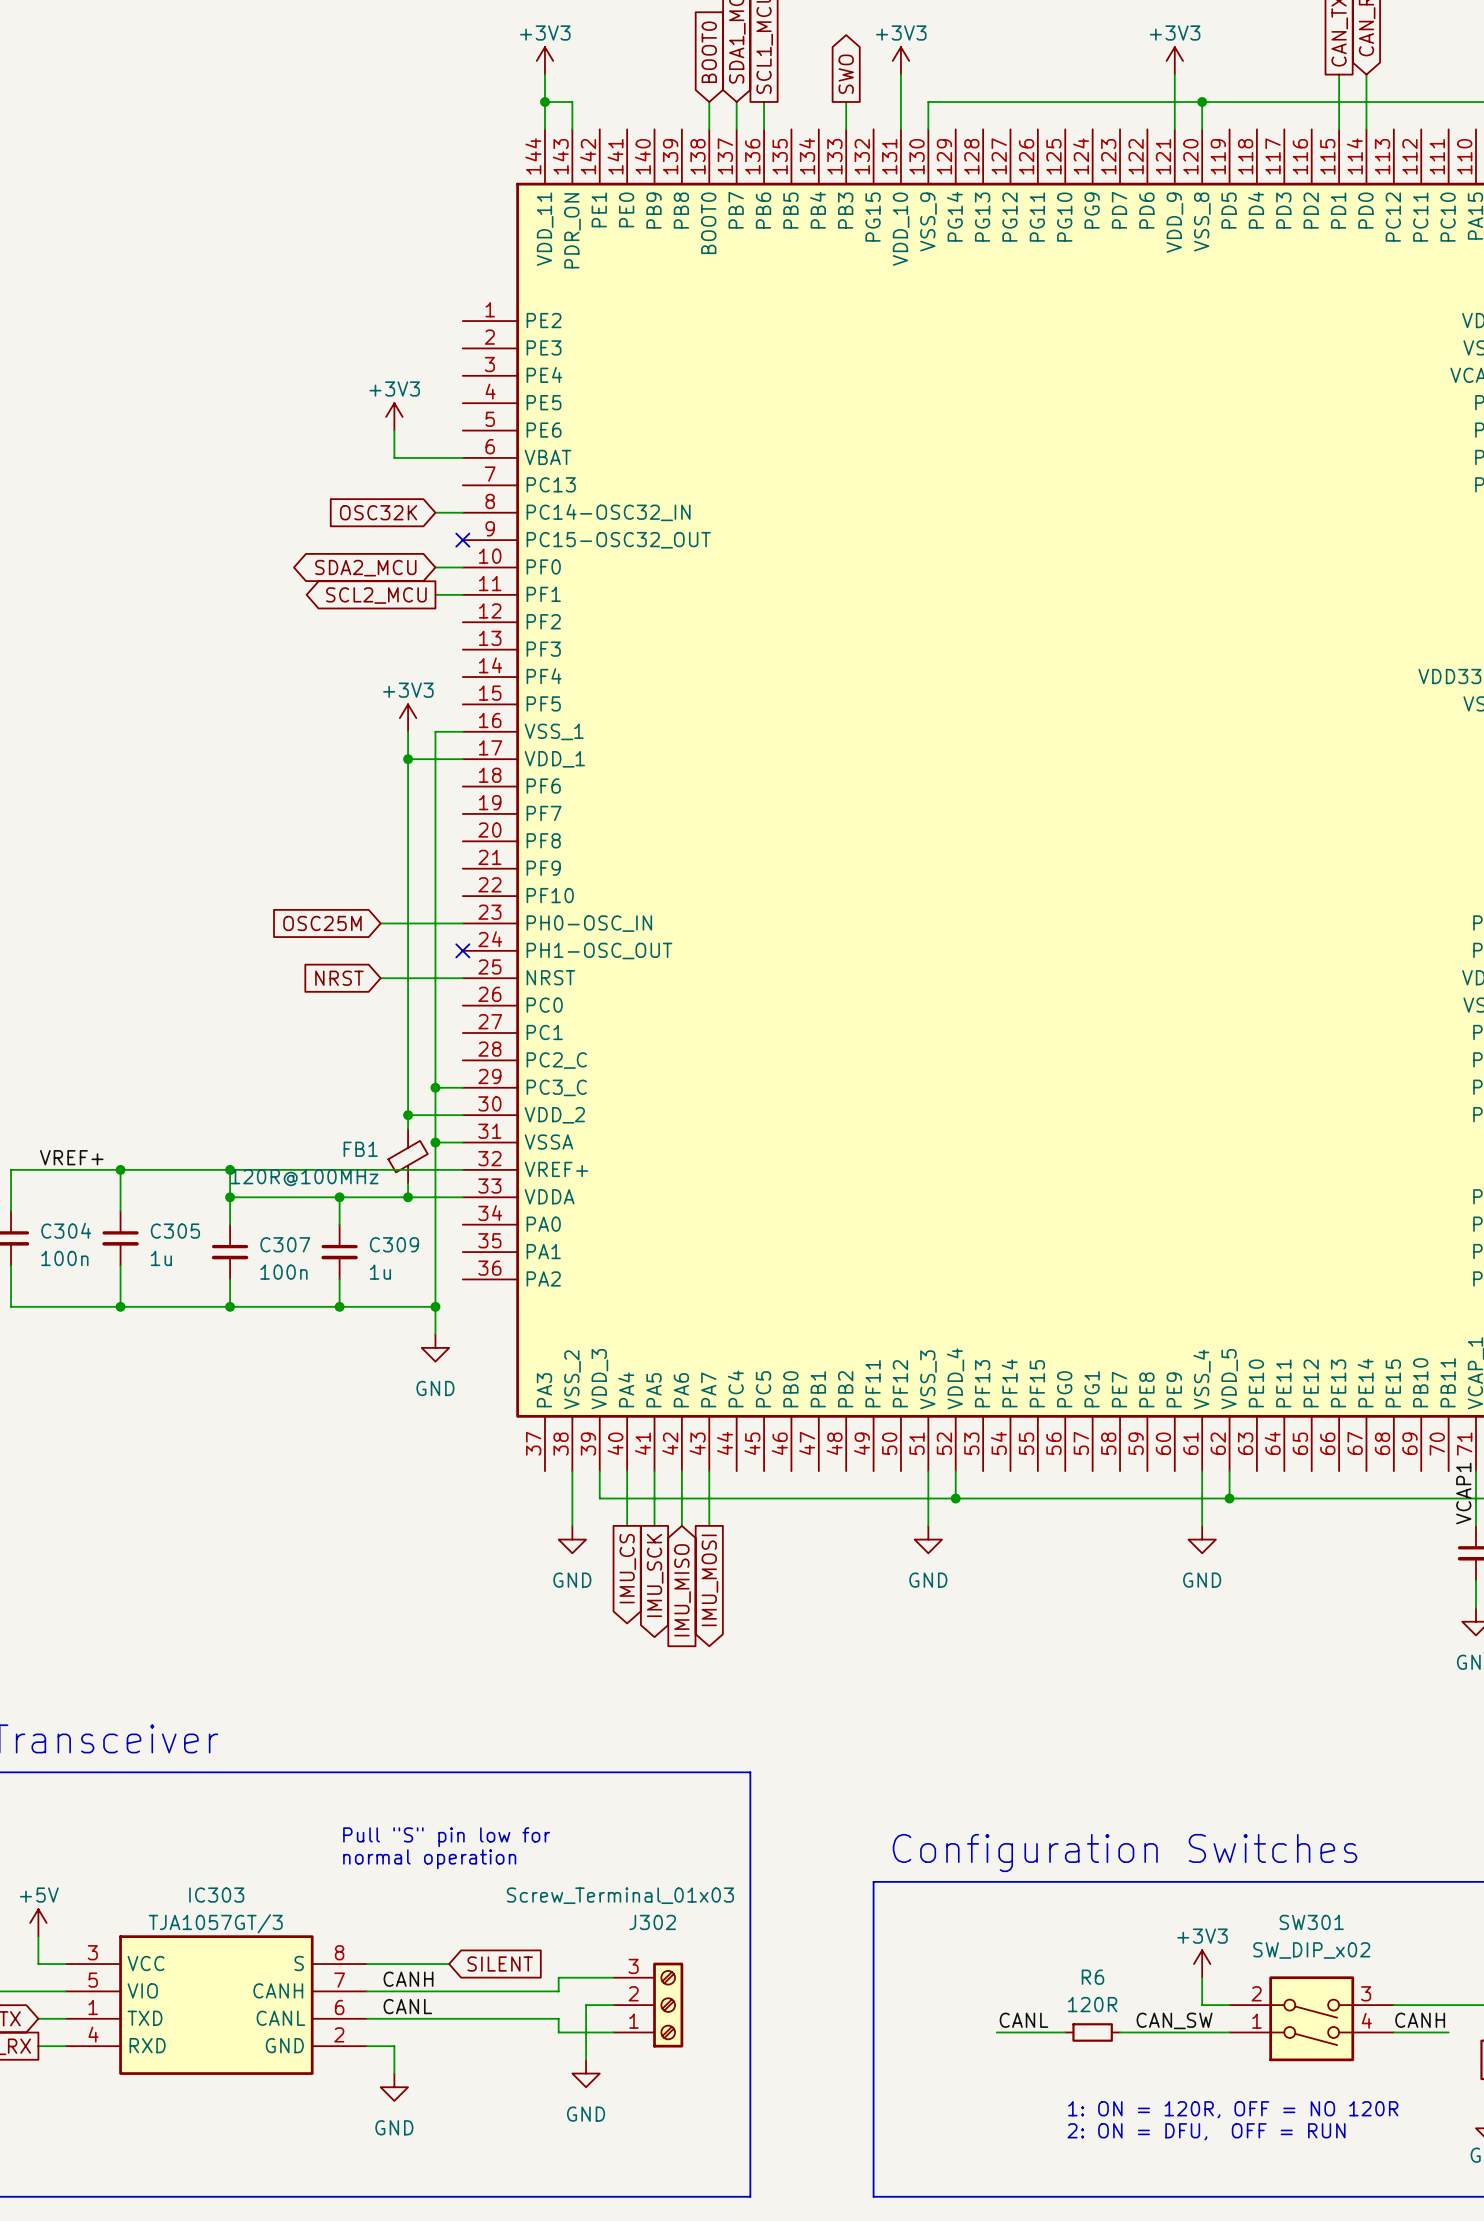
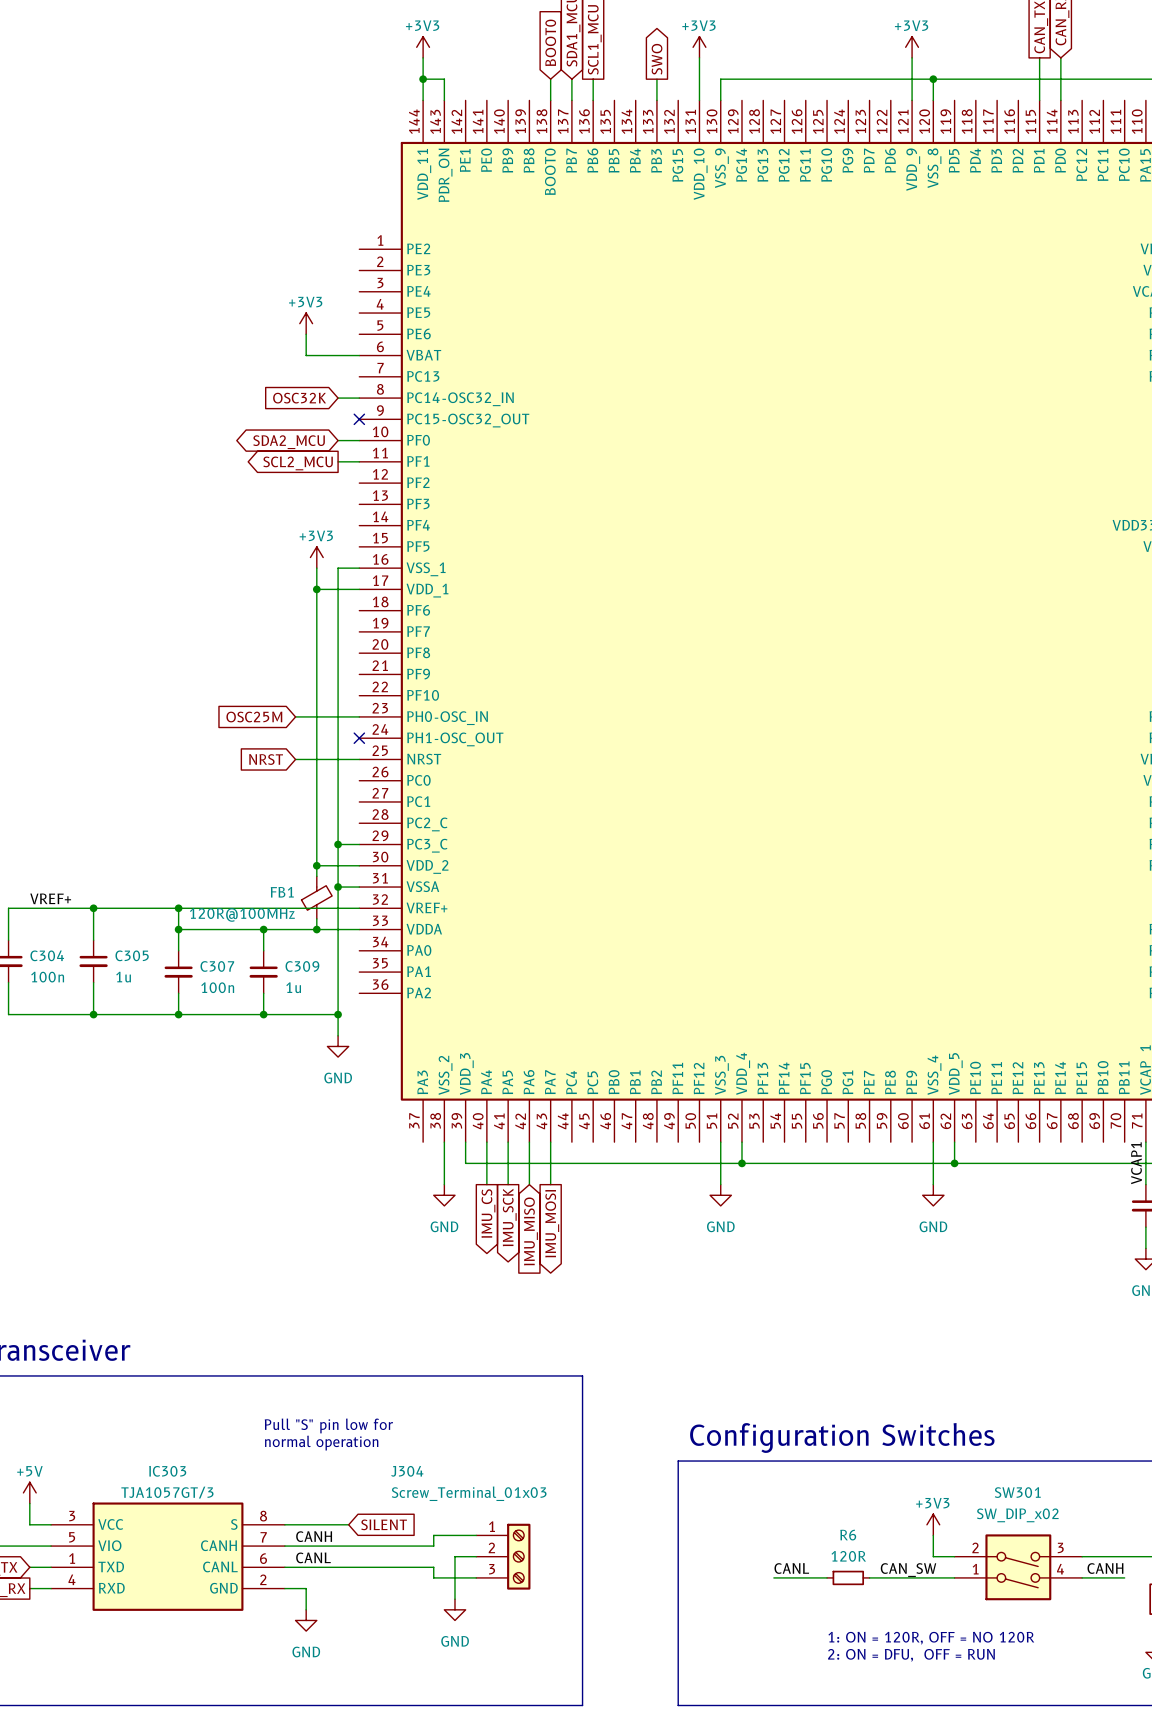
J302: Screw_Terminal_01x03 (648, 2005) -> none
J304: none -> Screw_Terminal_01x03 (503, 1556)

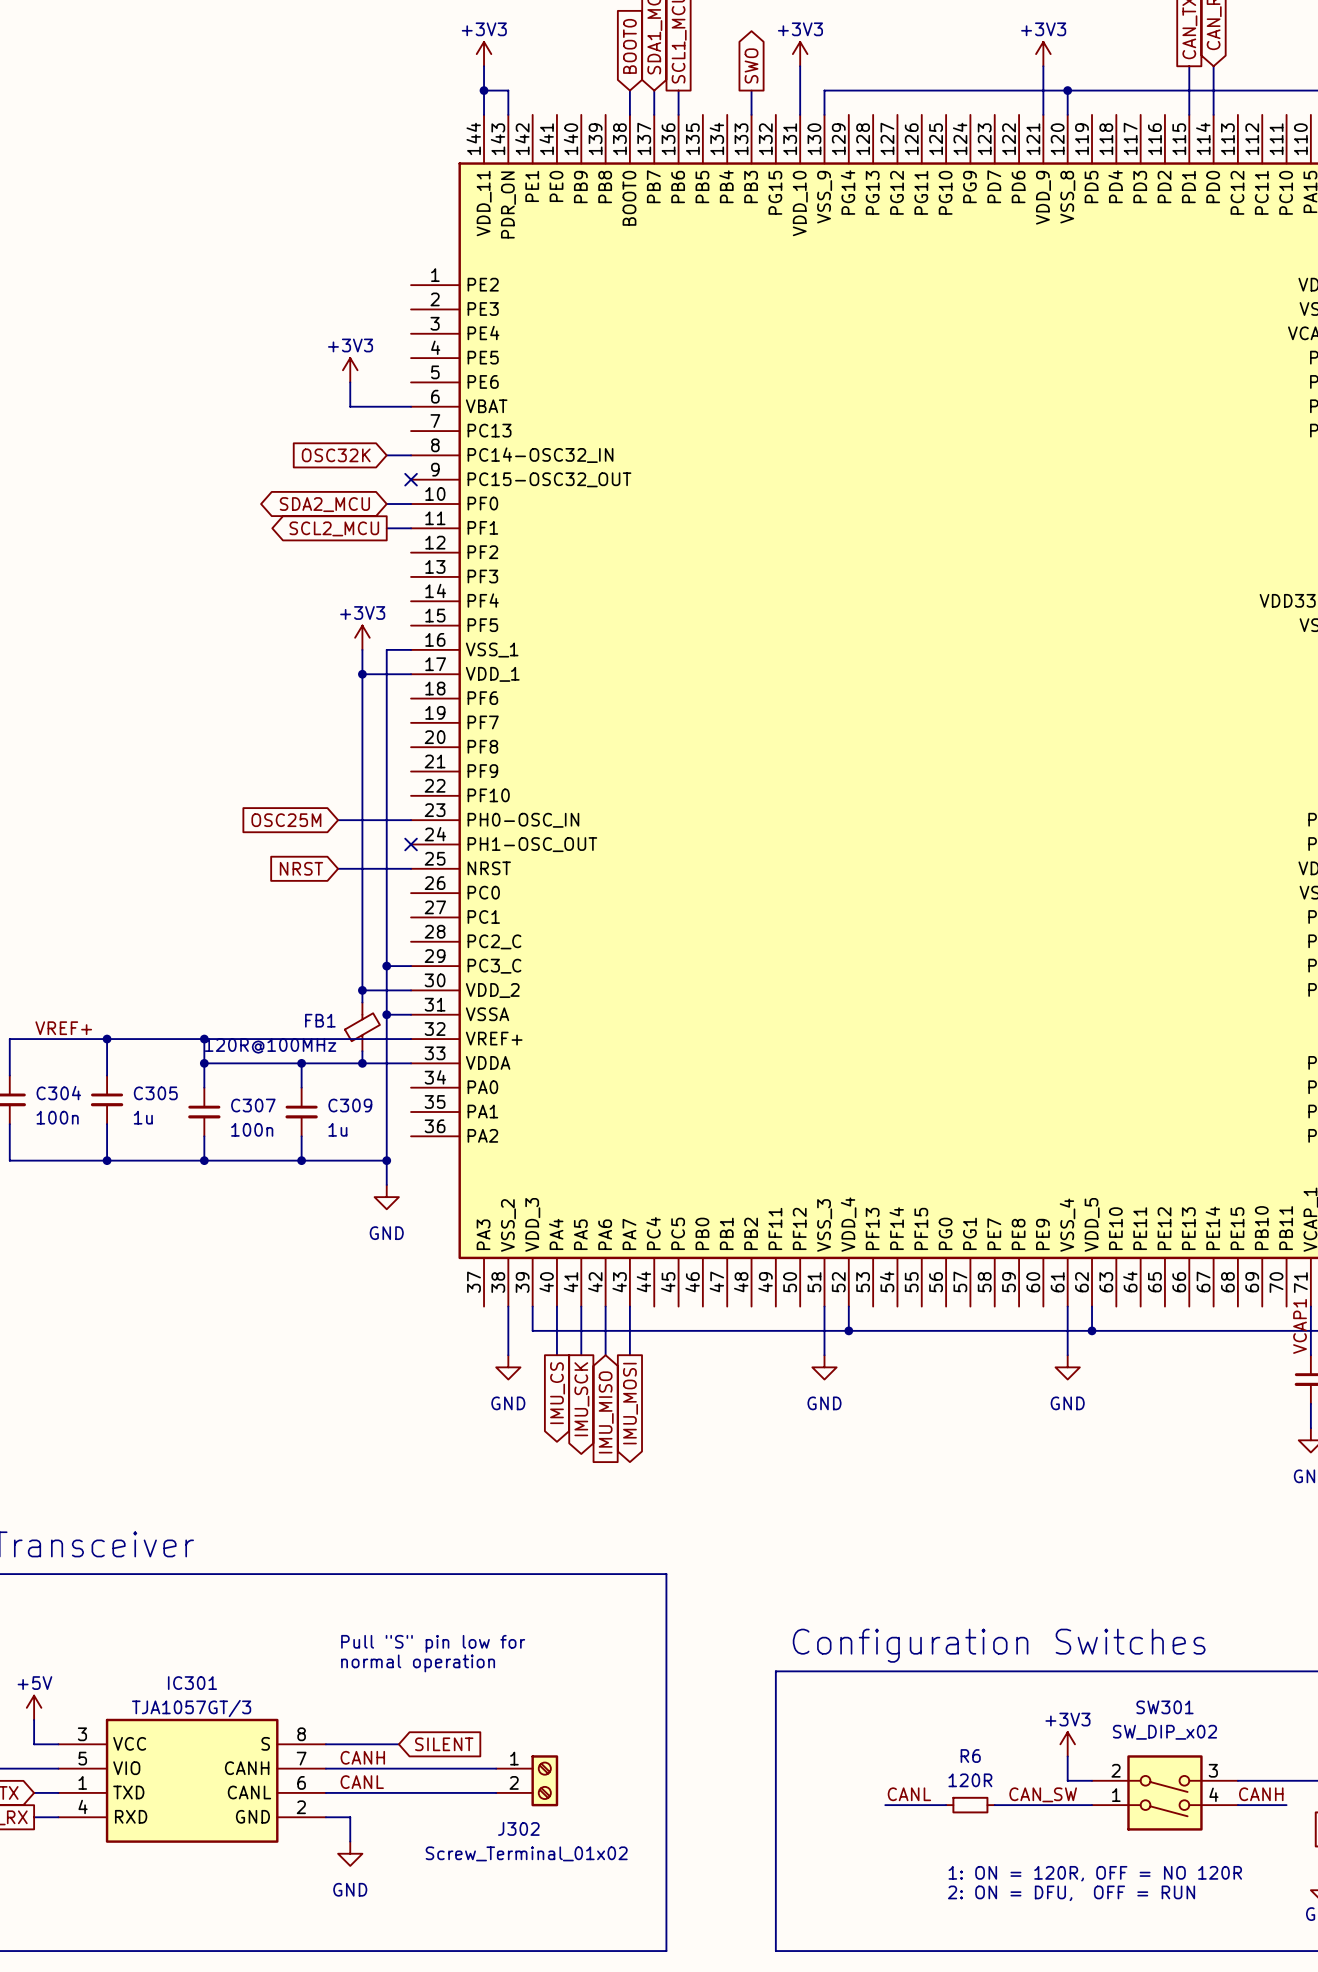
text position: Pull "S" pin low for (328, 1425) -> Pull "S" pin low for (433, 1643)
text position: normal operation (321, 1443) -> normal operation (418, 1663)
IC303 name: IC303 (167, 1471) -> IC301 (192, 1683)
wire: (476, 1535) (433, 1535) (433, 1546) -> none
J302: none -> Screw_Terminal_01x02 (527, 1780)
wire: (476, 1556) (454, 1556) (454, 1599) -> none
J304: Screw_Terminal_01x03 (503, 1556) -> none
wire: (433, 1567) (433, 1577) (476, 1577) -> none
power symbol: GND (454, 1609) -> none

